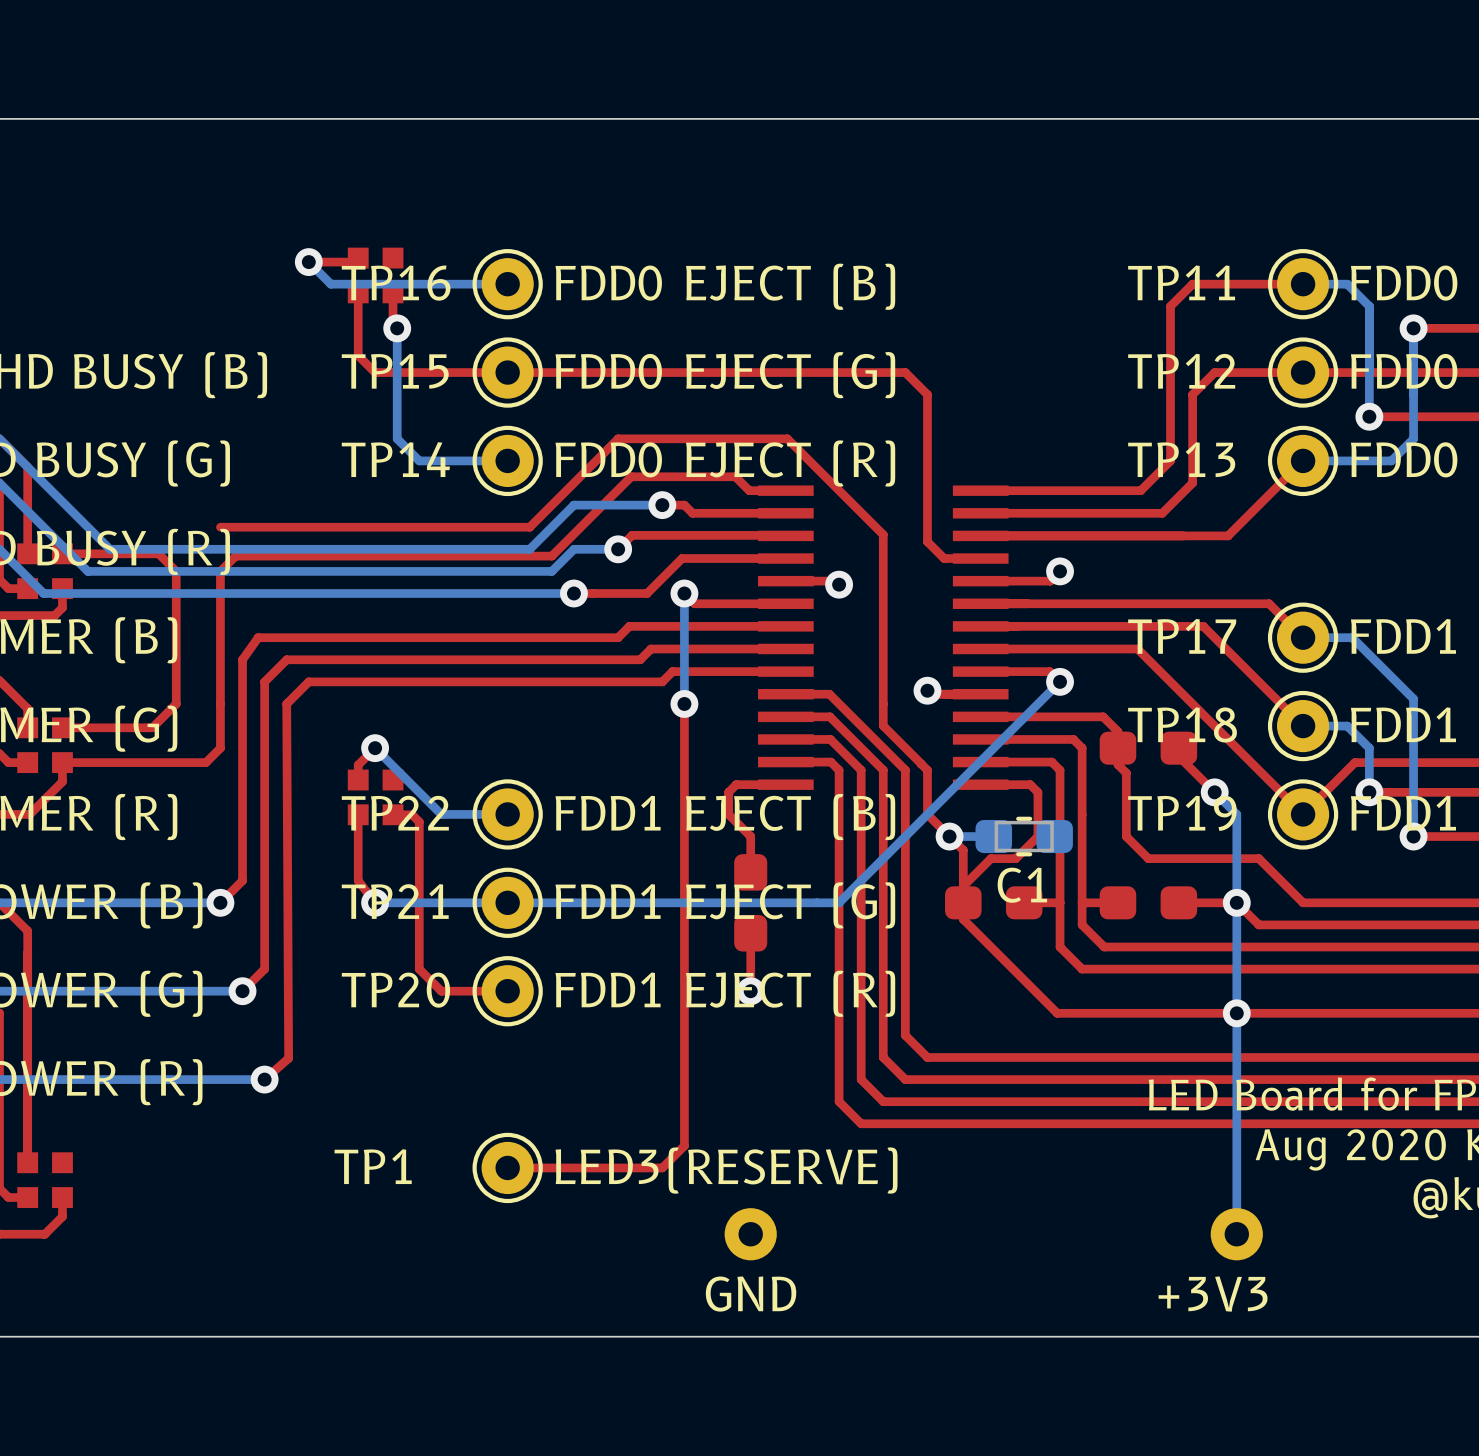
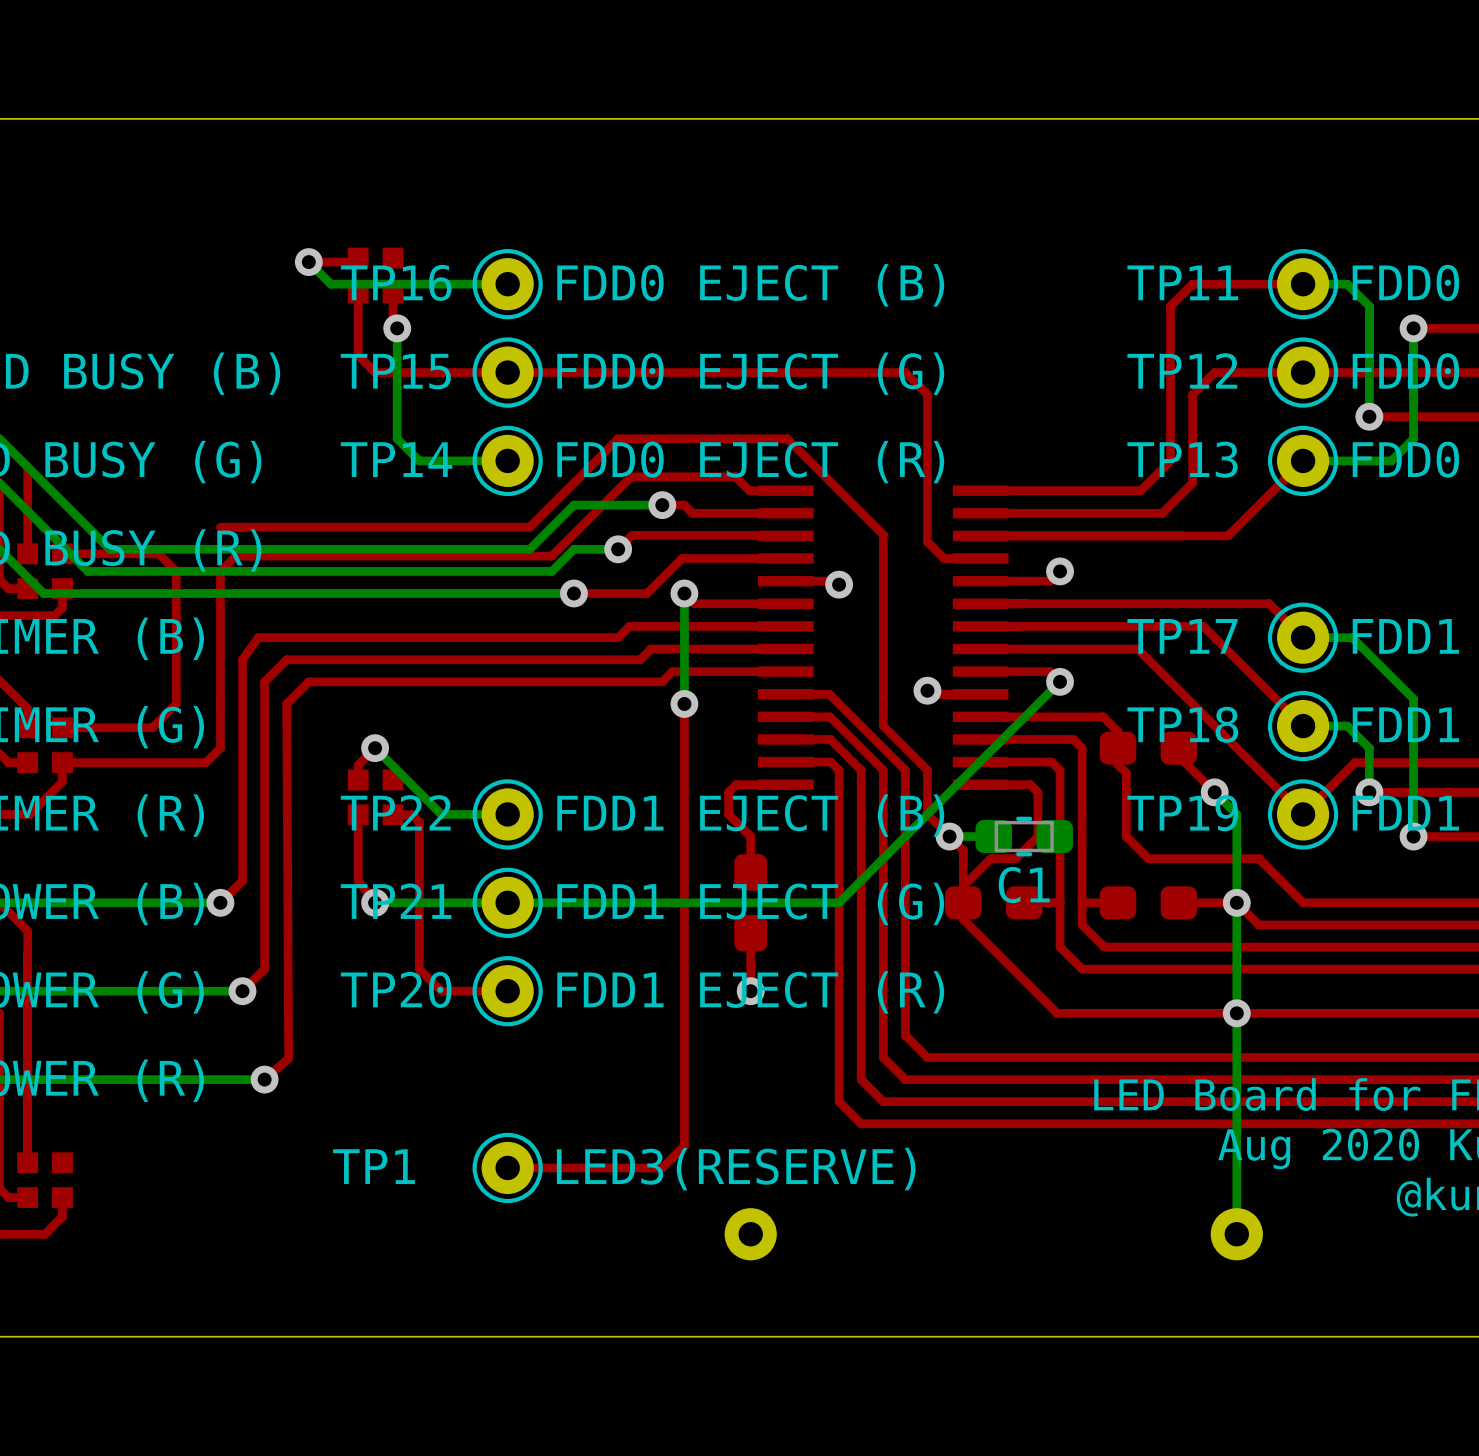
part value: GND (751, 1294) -> none
part value: +3V3 (1213, 1294) -> none

